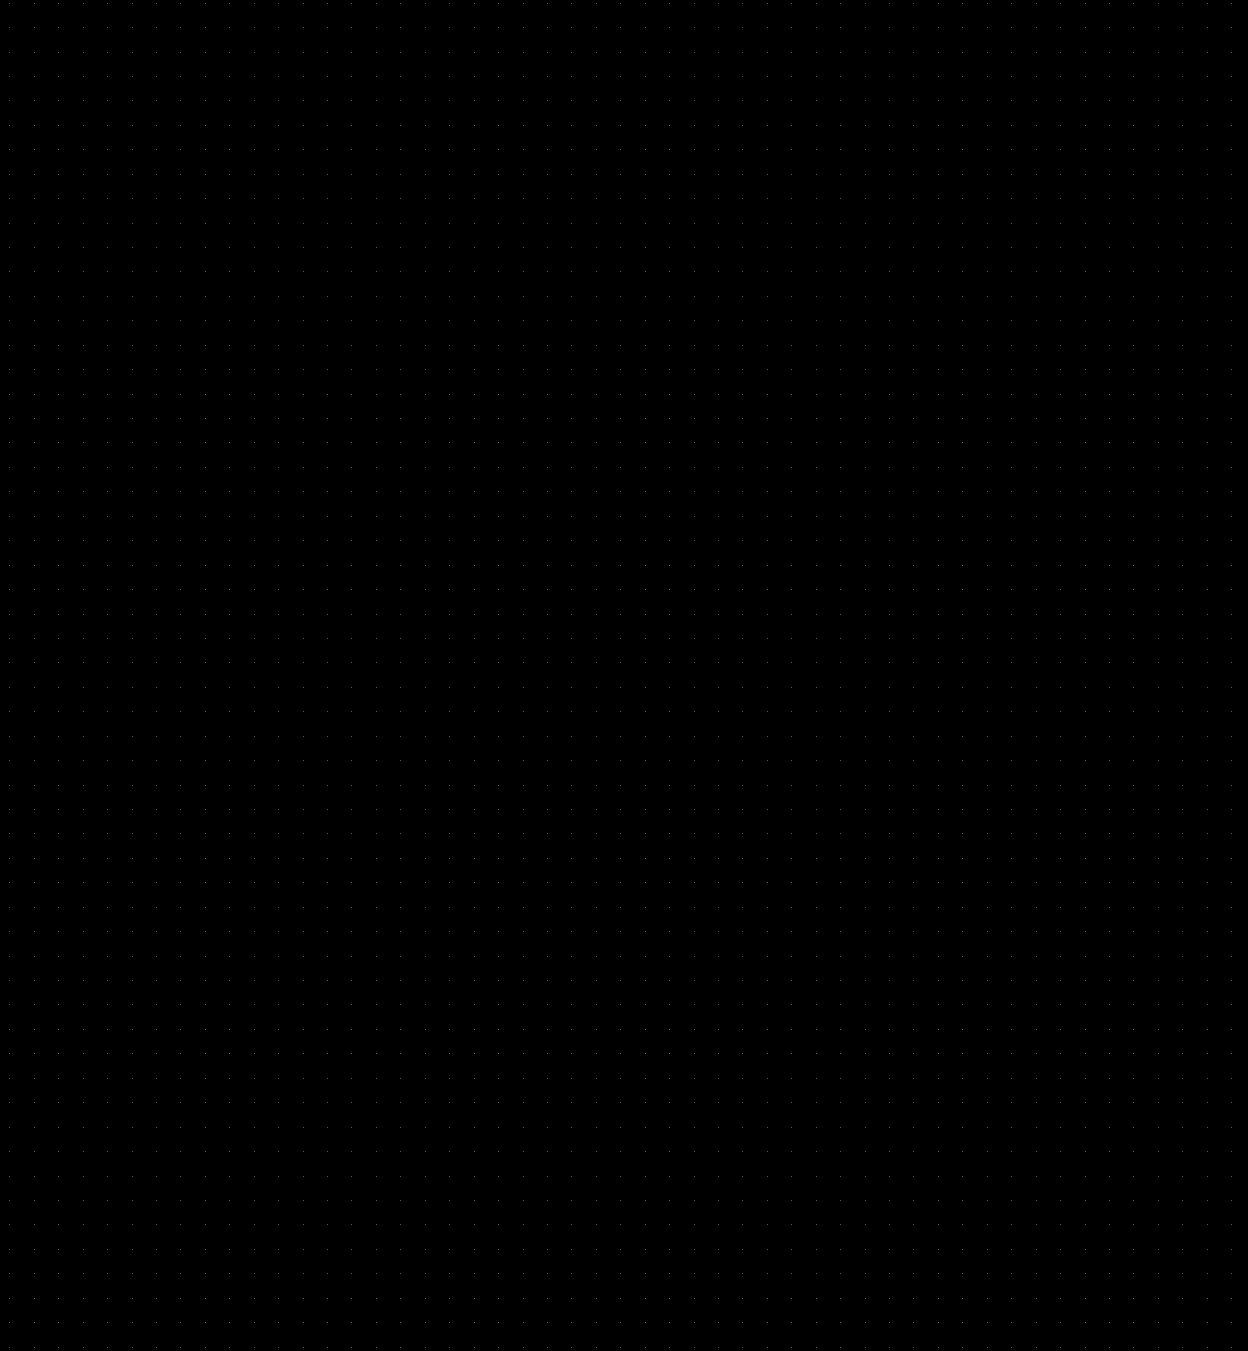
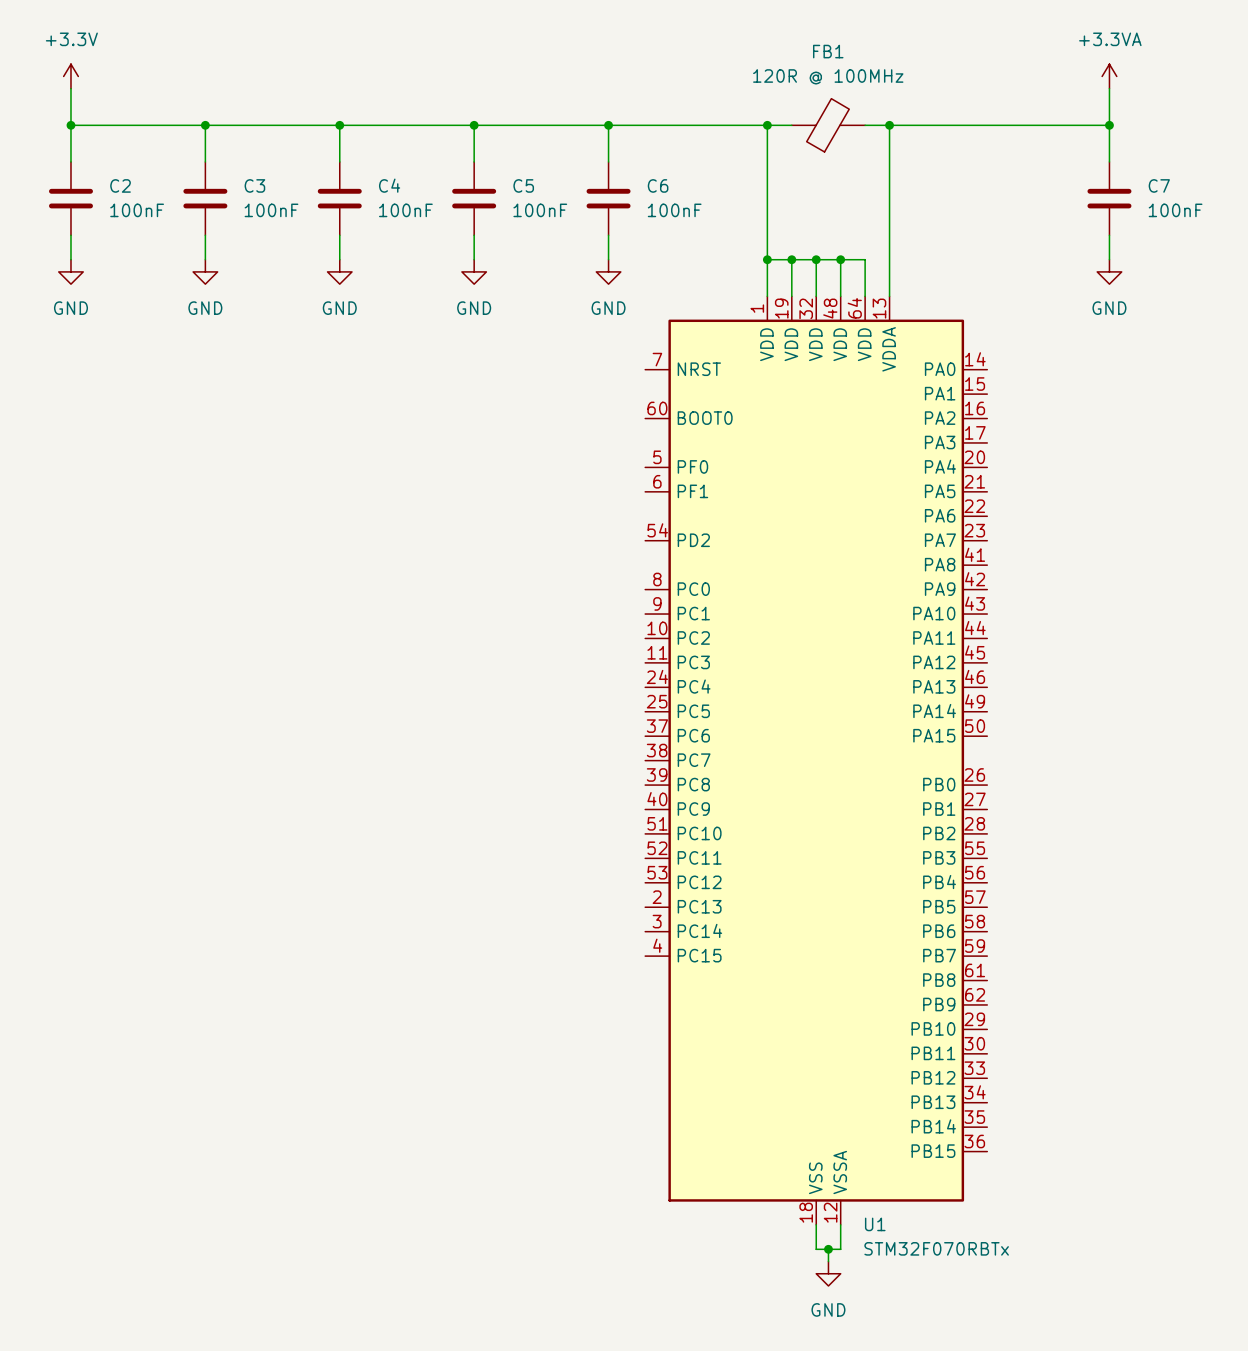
power symbol: none -> +3.3V (70, 76)
power symbol: none -> +3.3VA (1109, 76)
wire: none -> (70, 88) (70, 161)
wire: none -> (1109, 88) (1109, 161)
wire: none -> (70, 125) (791, 125)
junction: none -> (70, 125)
wire: none -> (205, 125) (205, 161)
junction: none -> (205, 125)
wire: none -> (339, 125) (339, 161)
junction: none -> (339, 125)
wire: none -> (474, 125) (474, 161)
junction: none -> (474, 125)
wire: none -> (608, 125) (608, 161)
junction: none -> (608, 125)
wire: none -> (767, 125) (767, 296)
junction: none -> (767, 125)
FB1: none -> 120R @ 100MHz (828, 125)
wire: none -> (865, 125) (1109, 125)
wire: none -> (889, 125) (889, 296)
junction: none -> (889, 125)
junction: none -> (1109, 125)
C2: none -> 100nF (70, 198)
C3: none -> 100nF (205, 198)
C4: none -> 100nF (339, 198)
C5: none -> 100nF (474, 198)
C6: none -> 100nF (608, 198)
C7: none -> 100nF (1109, 198)
wire: none -> (70, 235) (70, 259)
wire: none -> (205, 235) (205, 259)
wire: none -> (339, 235) (339, 259)
wire: none -> (474, 235) (474, 259)
wire: none -> (608, 235) (608, 259)
wire: none -> (1109, 235) (1109, 259)
wire: none -> (767, 259) (865, 259) (865, 296)
junction: none -> (767, 259)
wire: none -> (791, 259) (791, 296)
junction: none -> (791, 259)
wire: none -> (816, 259) (816, 296)
junction: none -> (816, 259)
wire: none -> (840, 259) (840, 296)
junction: none -> (840, 259)
power symbol: none -> GND (70, 271)
power symbol: none -> GND (205, 271)
power symbol: none -> GND (339, 271)
power symbol: none -> GND (474, 271)
power symbol: none -> GND (608, 271)
power symbol: none -> GND (1109, 271)
U1: none -> STM32F070RBTx (816, 760)
wire: none -> (816, 1224) (816, 1249) (840, 1249) (840, 1224)
wire: none -> (828, 1249) (828, 1261)
junction: none -> (828, 1249)
power symbol: none -> GND (828, 1273)

